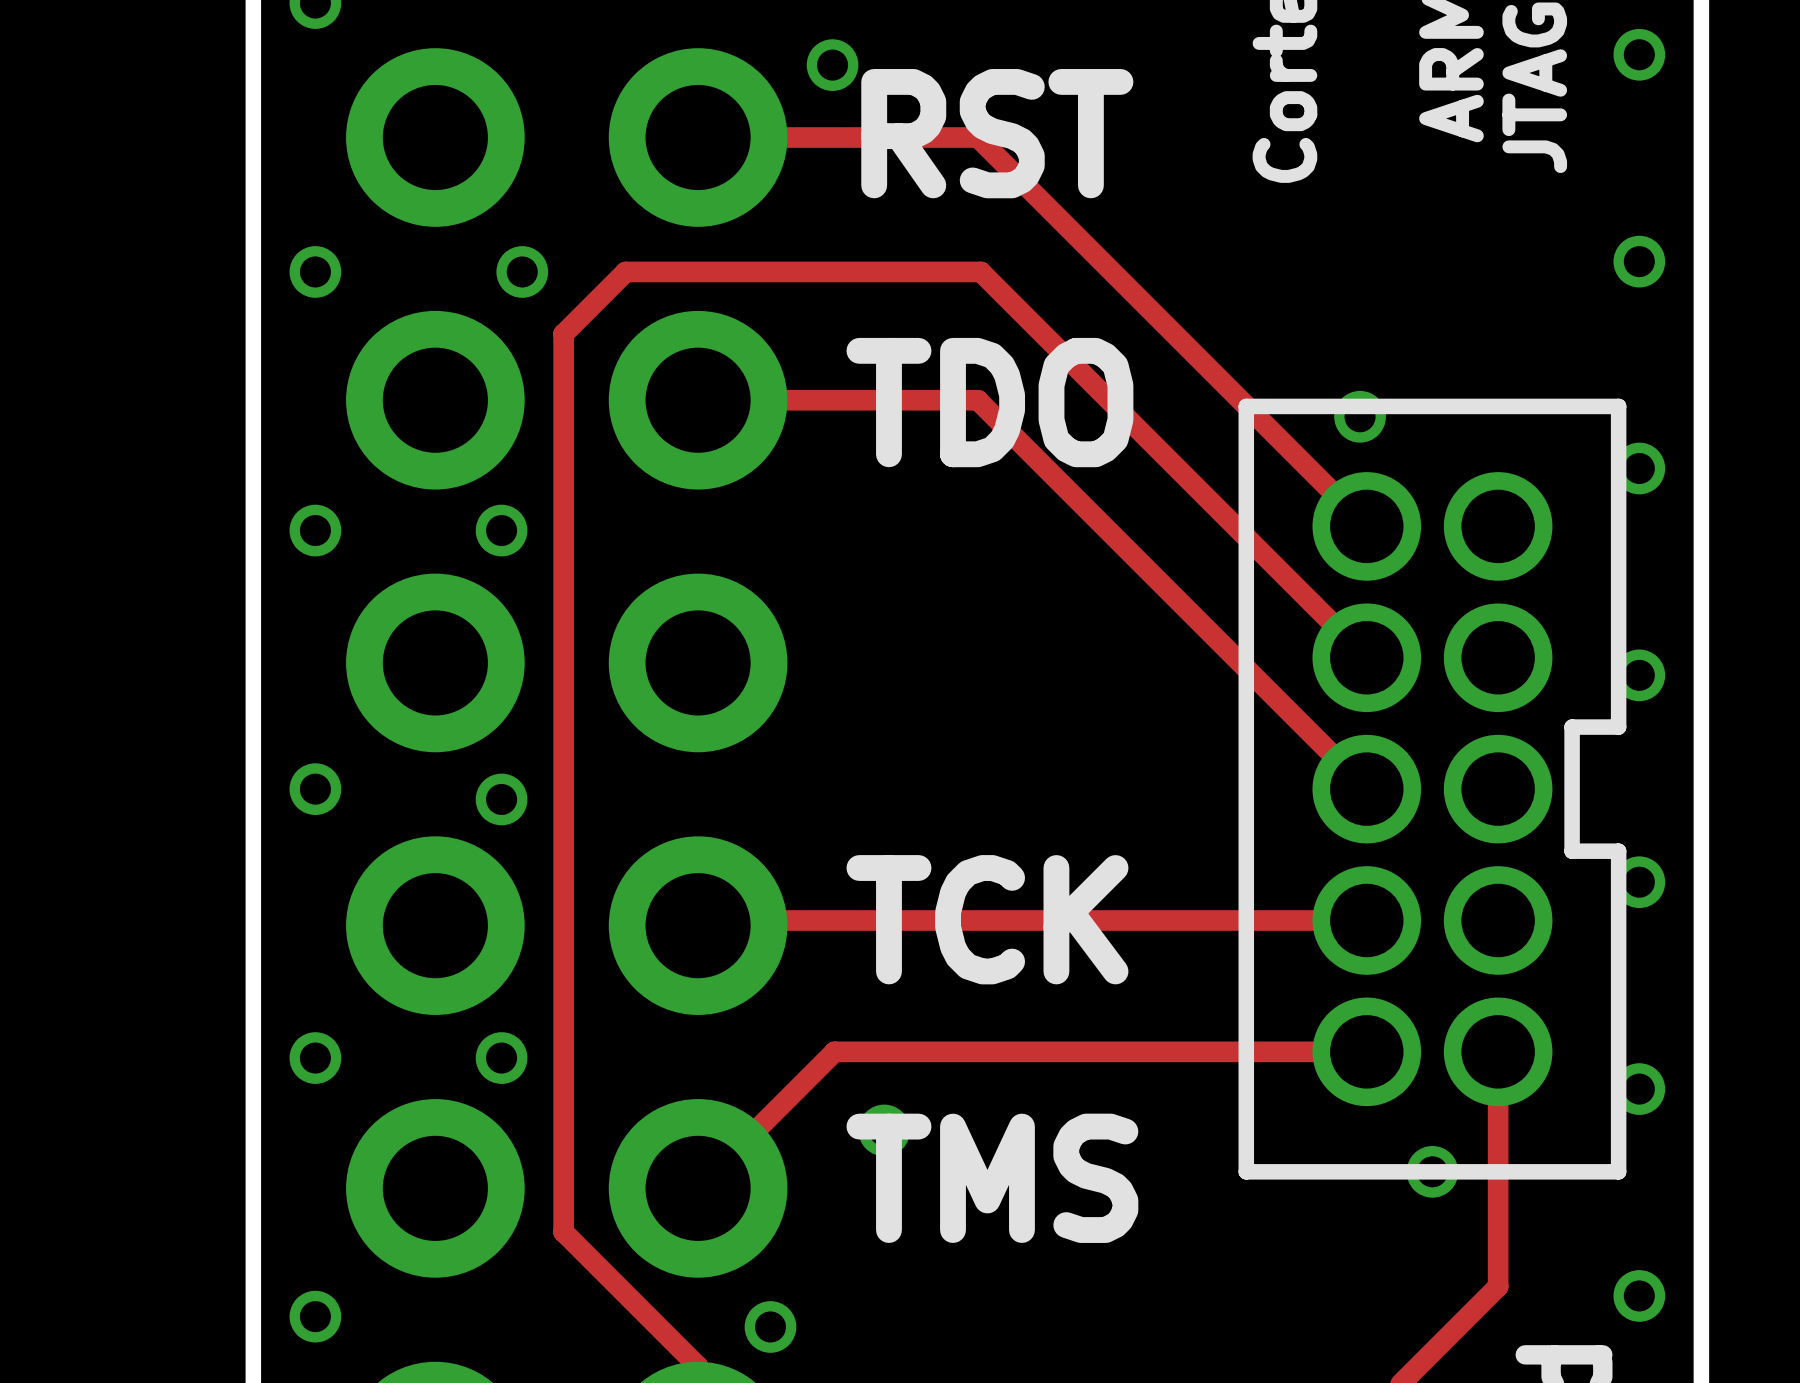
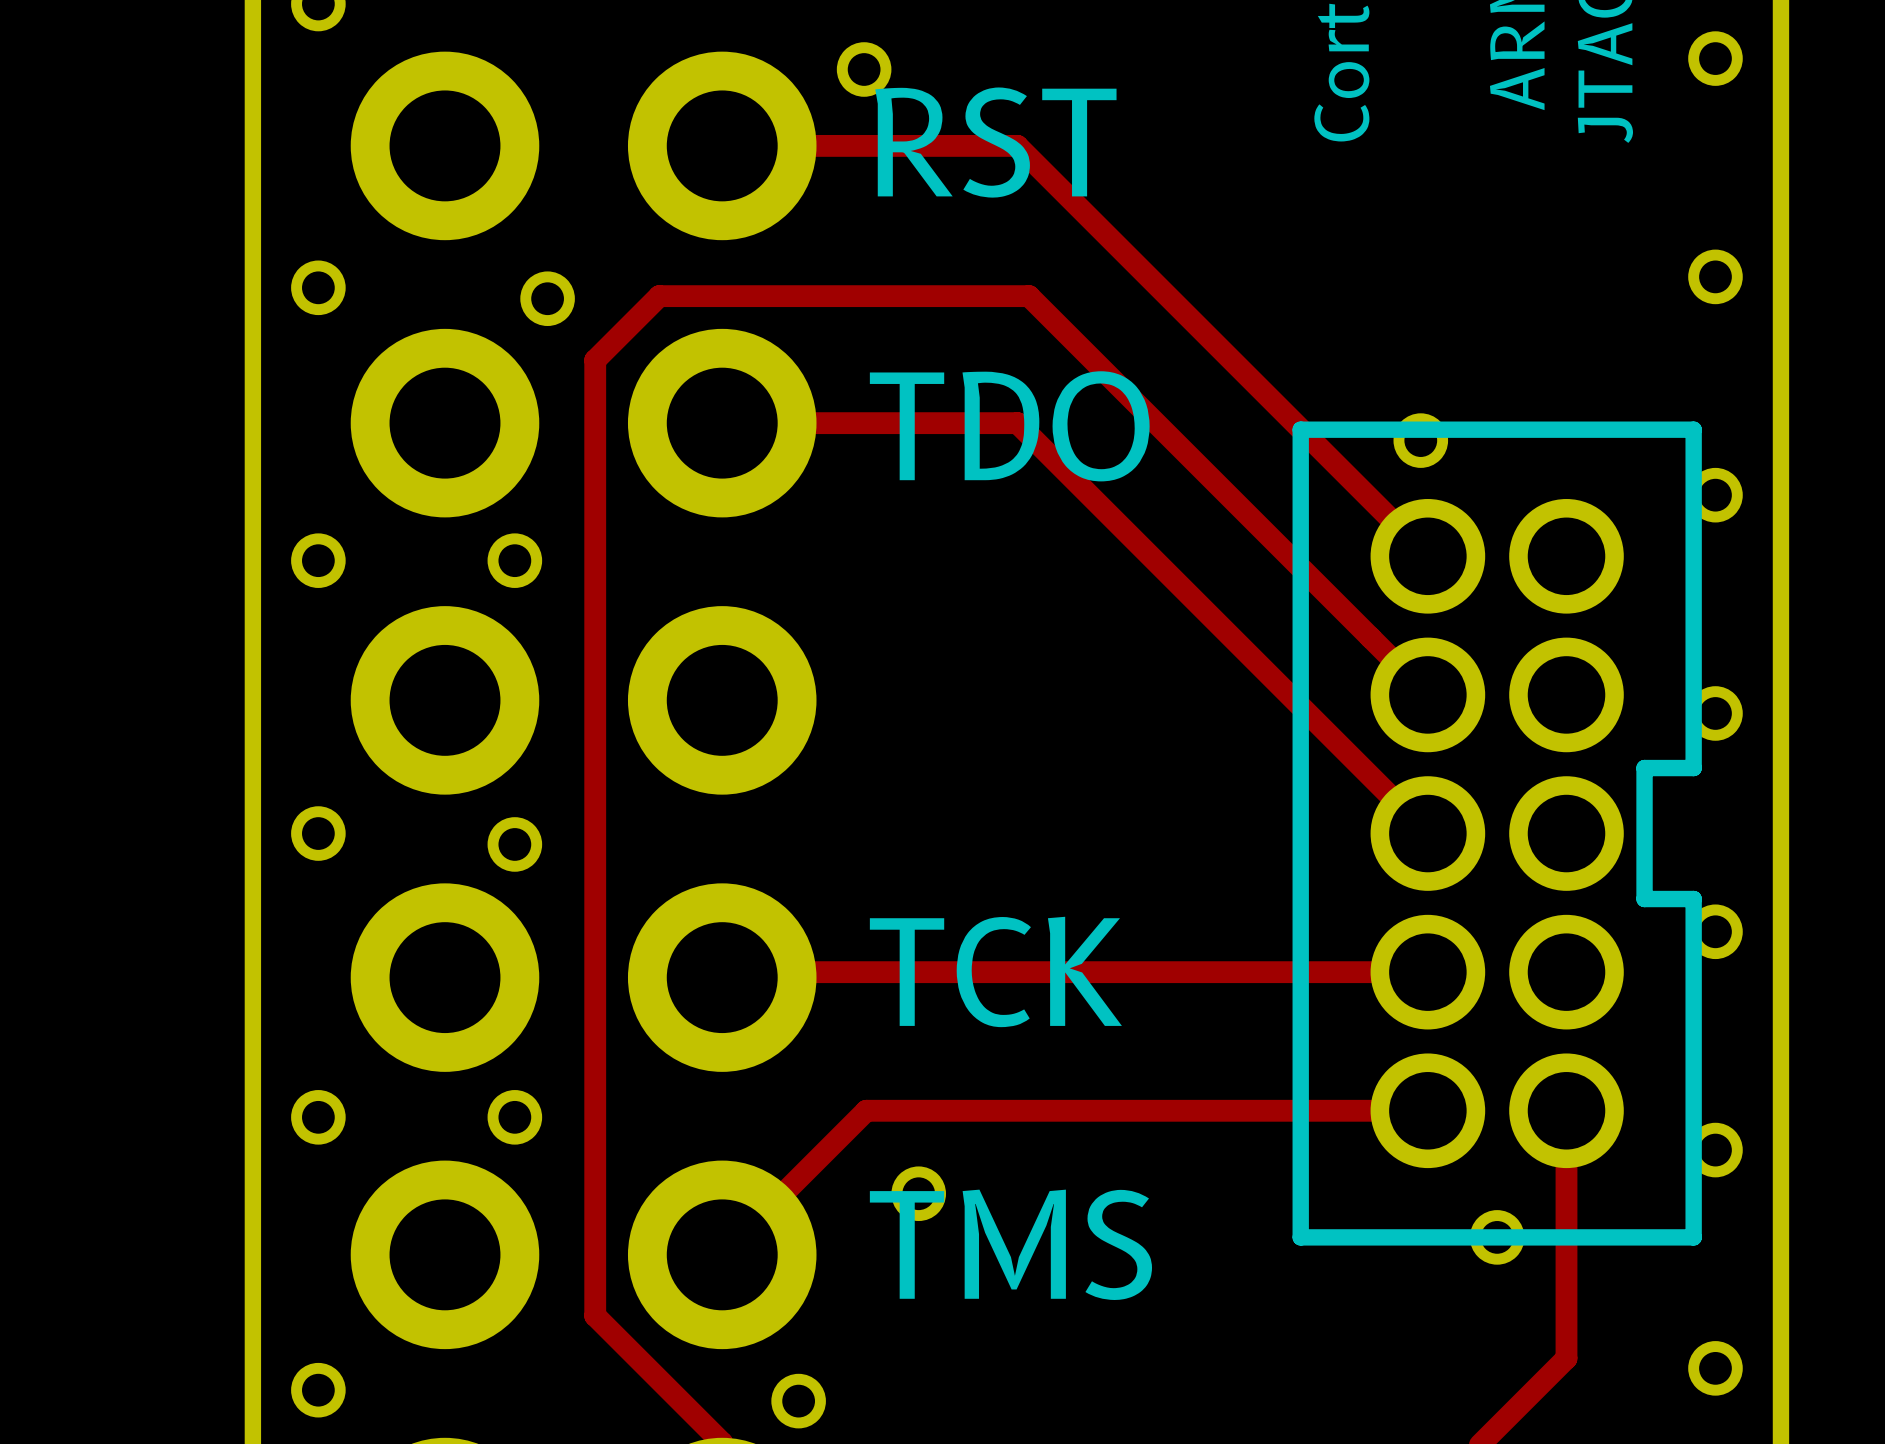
part position: (522, 271) -> (547, 298)
track: (988, 279) (980, 271) (625, 271) (563, 334) (563, 1232) (577, 1246) -> (1029, 296) (659, 296) (595, 360) (595, 1315)

